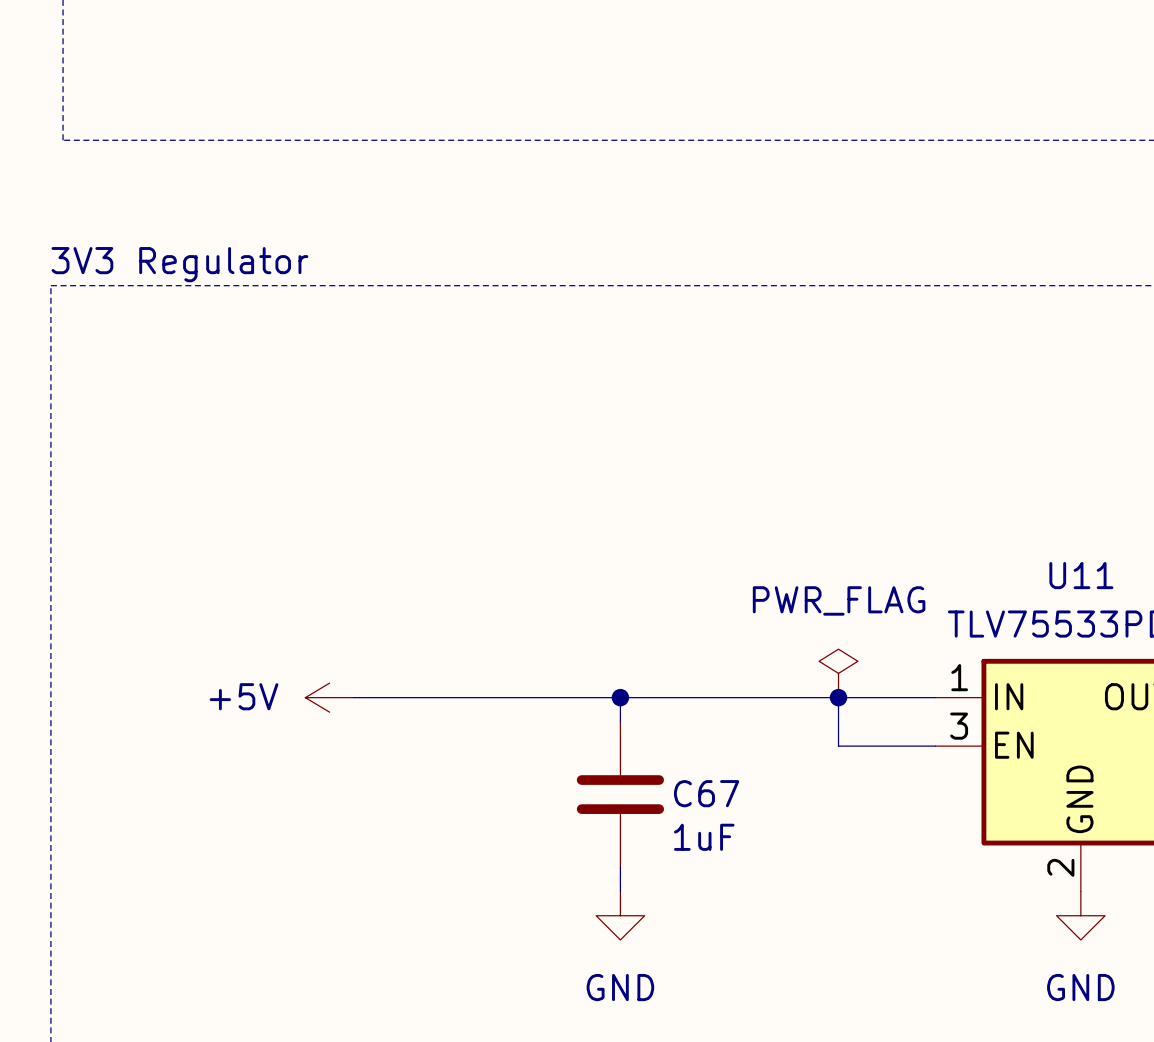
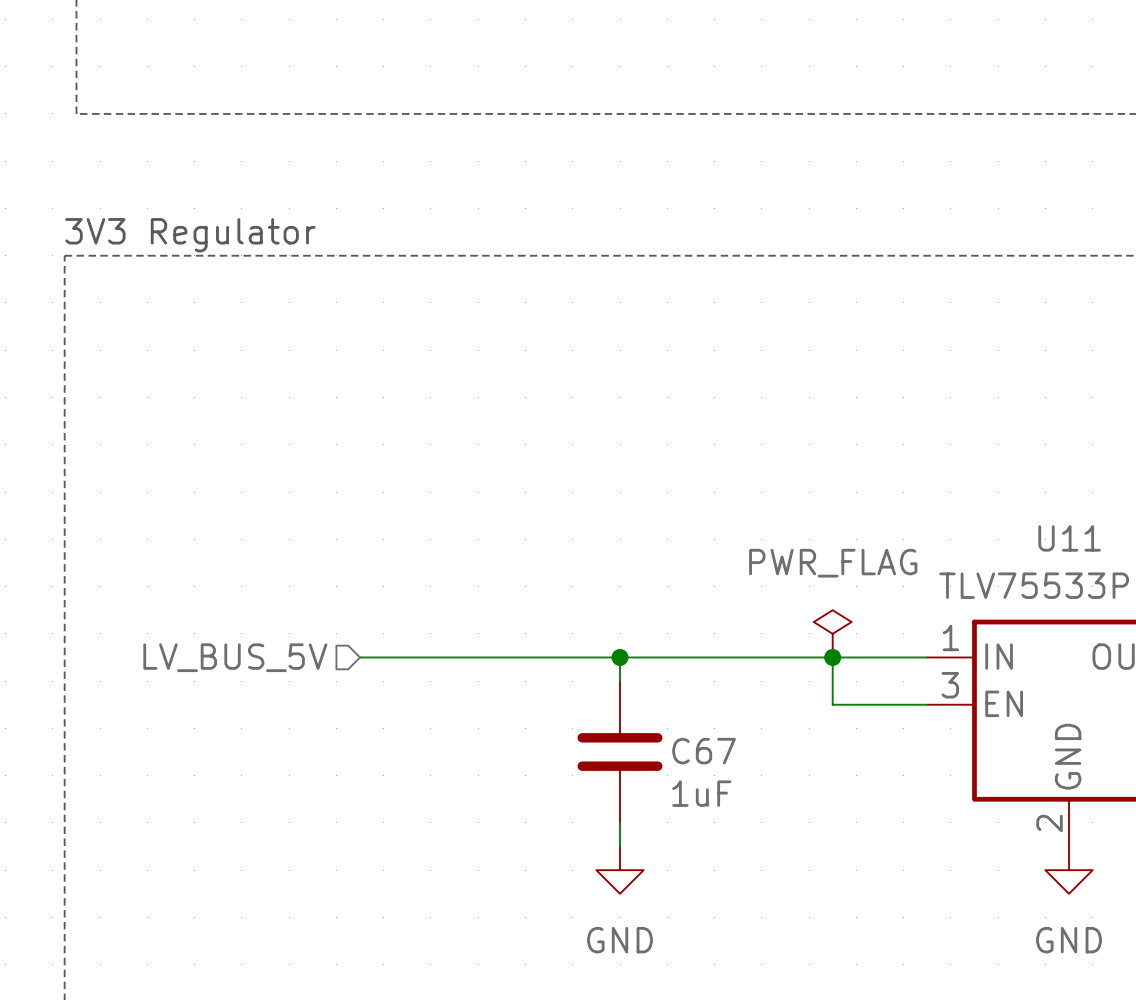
hierarchical label: none -> LV_BUS_5V (235, 657)
power symbol: +5V (329, 697) -> none

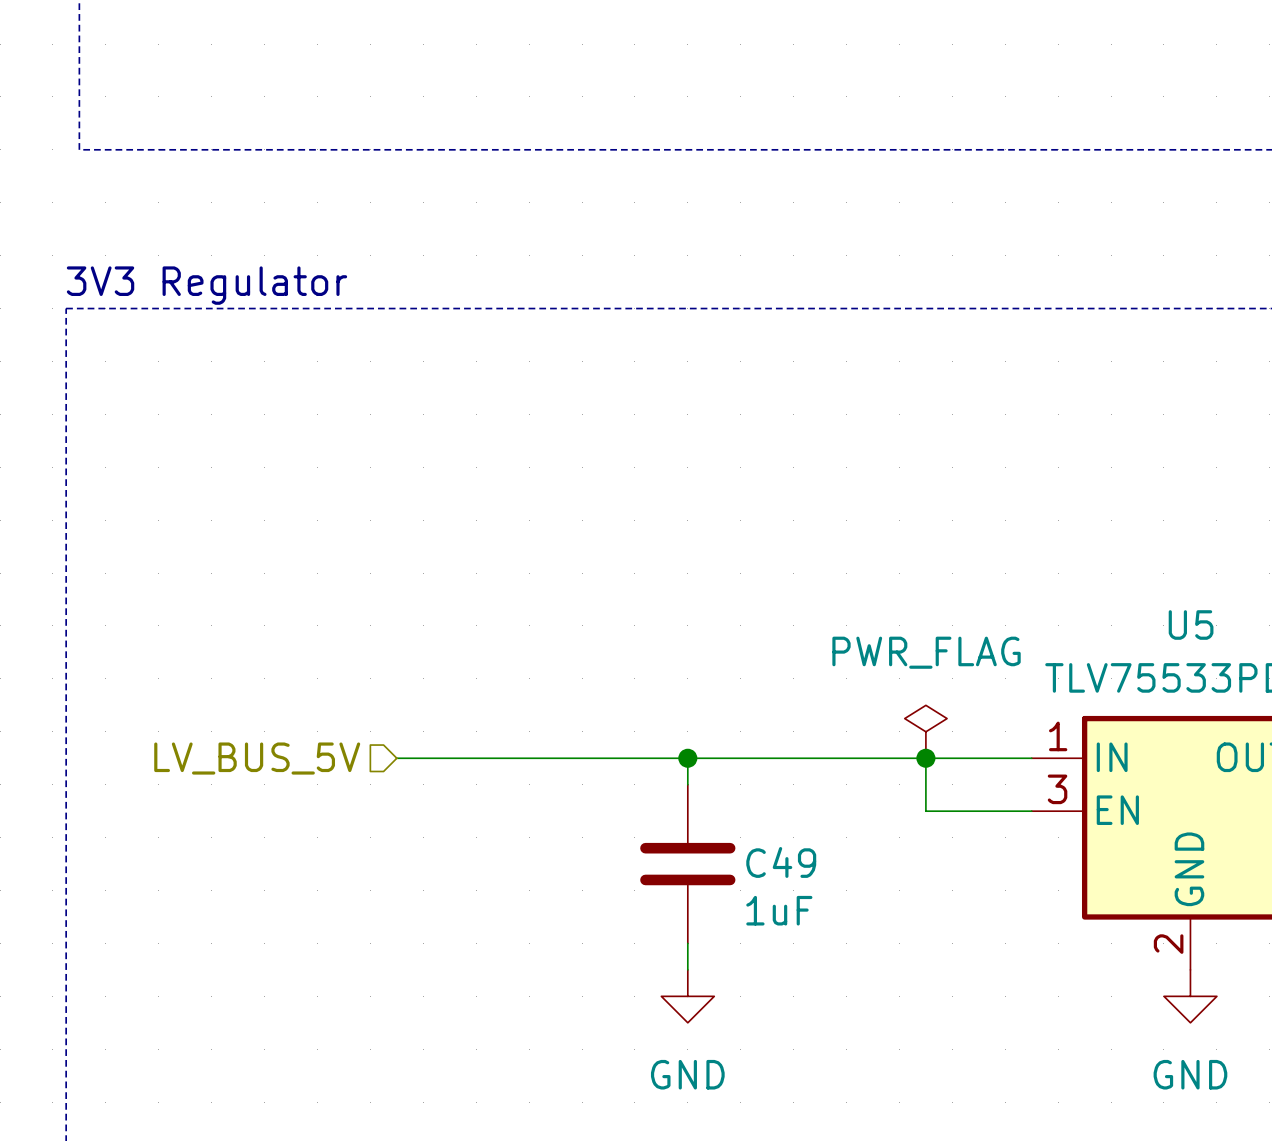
U11 name: U11 (1069, 538) -> U5 (1191, 625)
C67 name: C67 (704, 751) -> C49 (781, 862)

